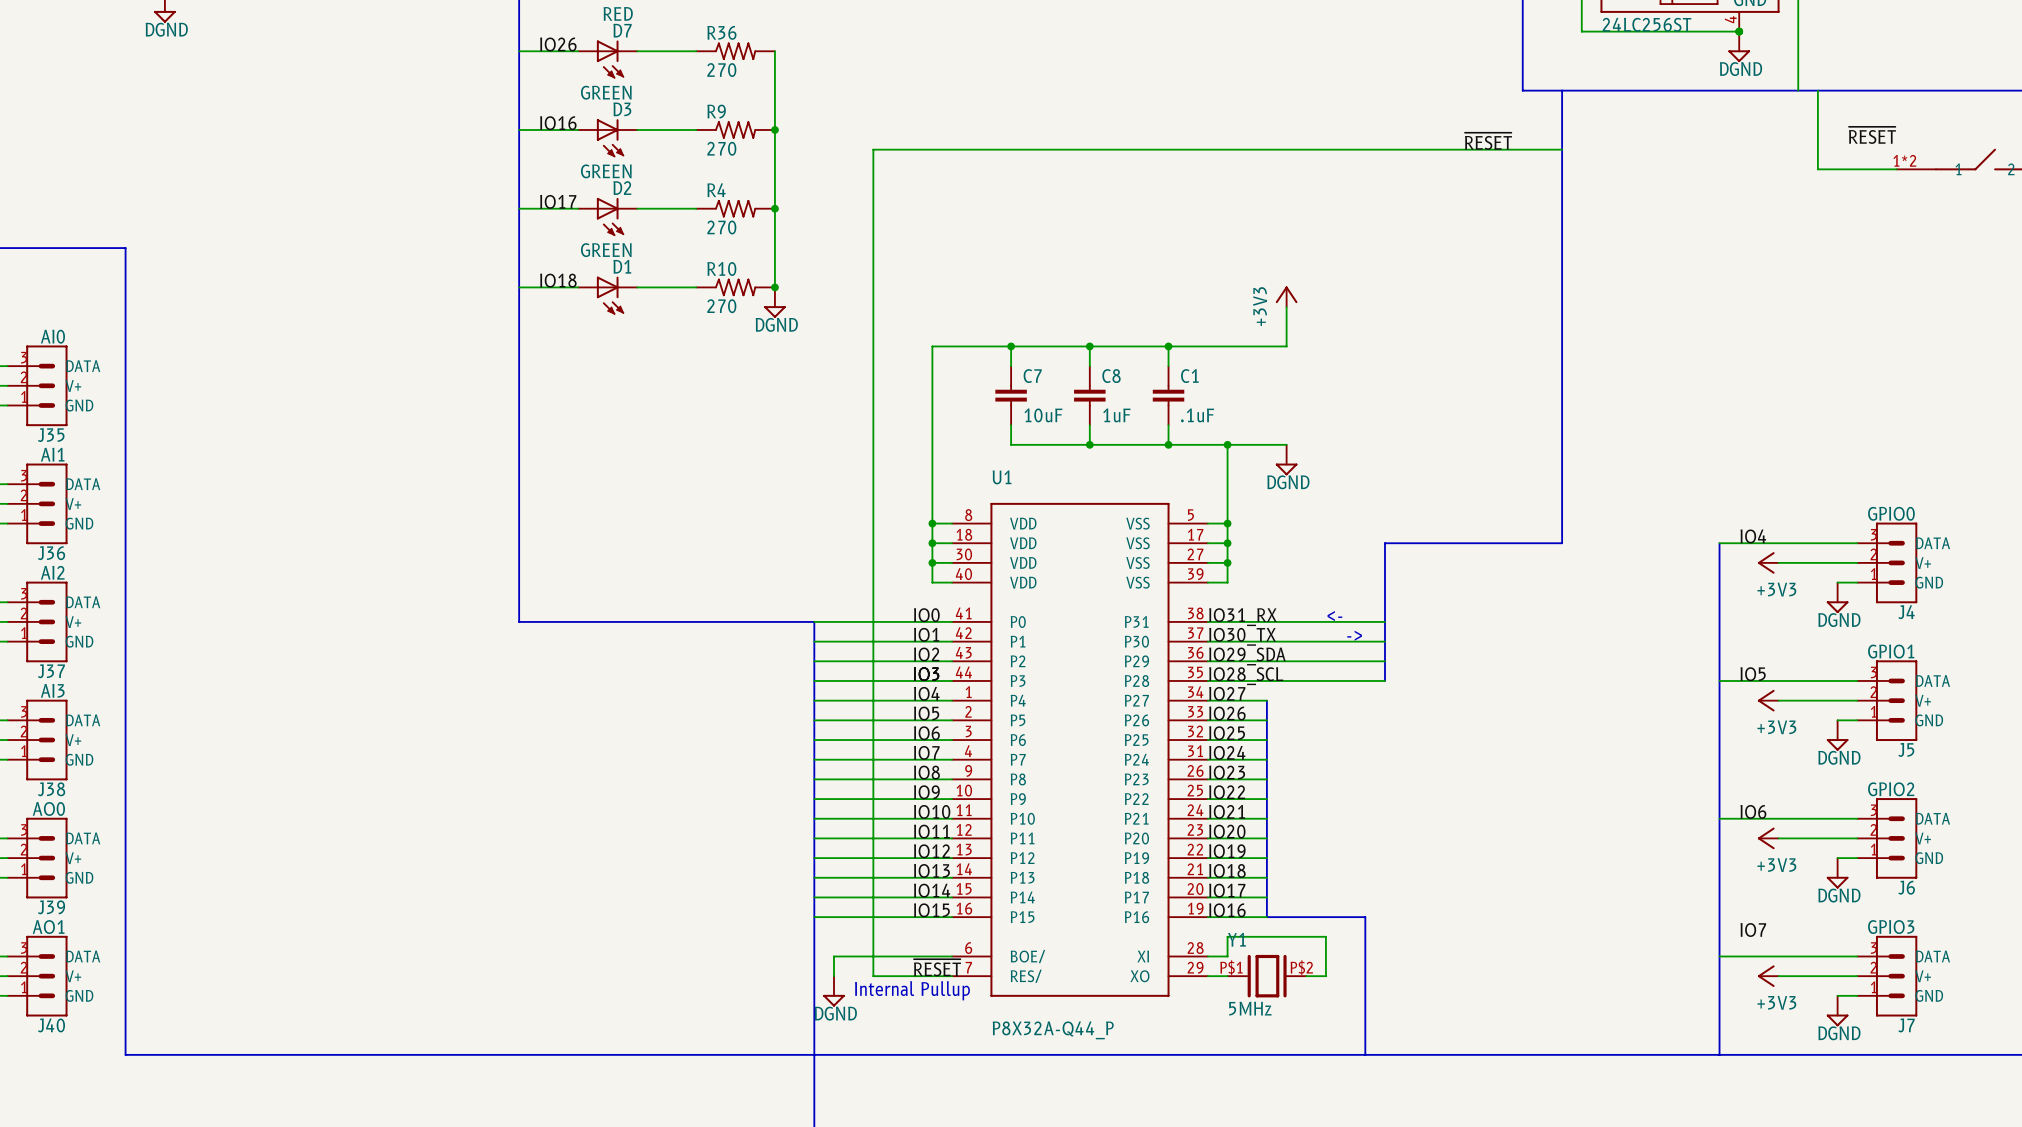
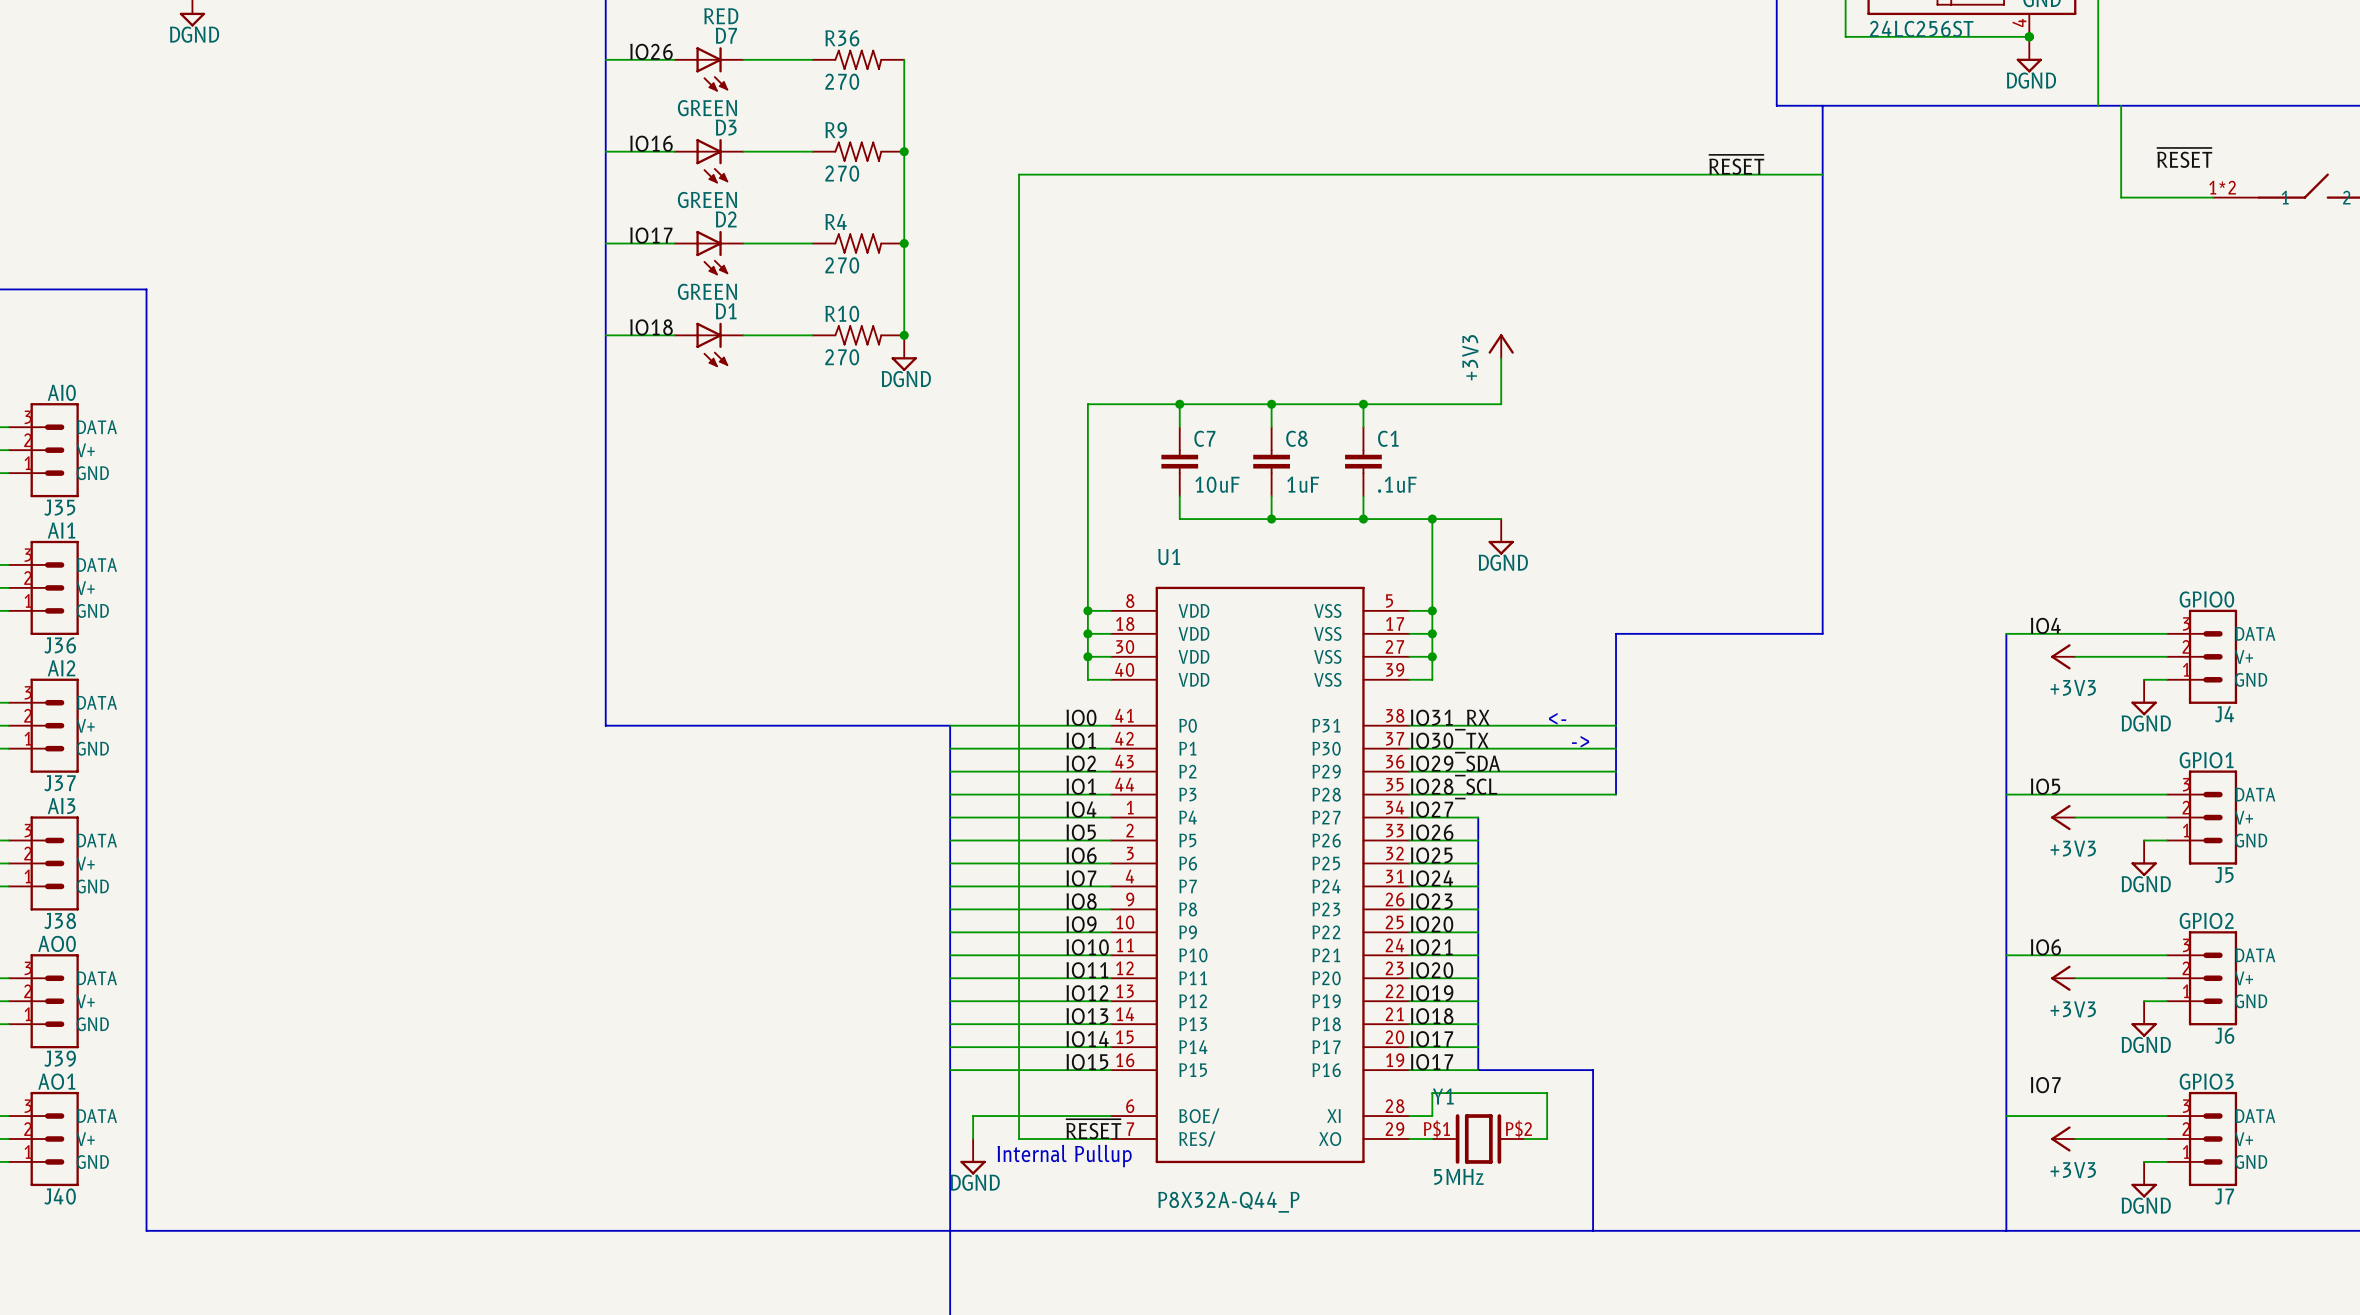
label: IO3 (926, 674) -> IO1 (1081, 786)
label: IO22 (1227, 792) -> IO20 (1432, 924)
label: IO16 (1227, 910) -> IO17 (1432, 1062)

